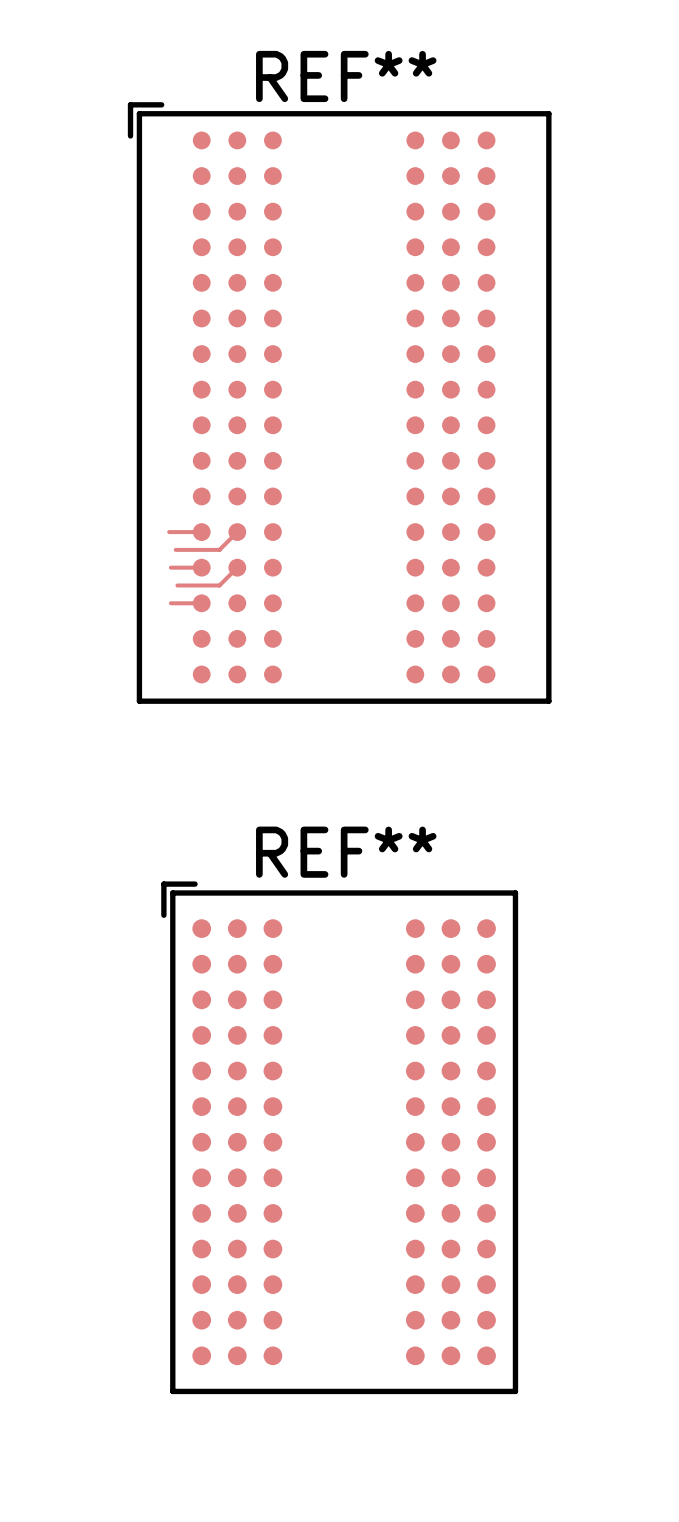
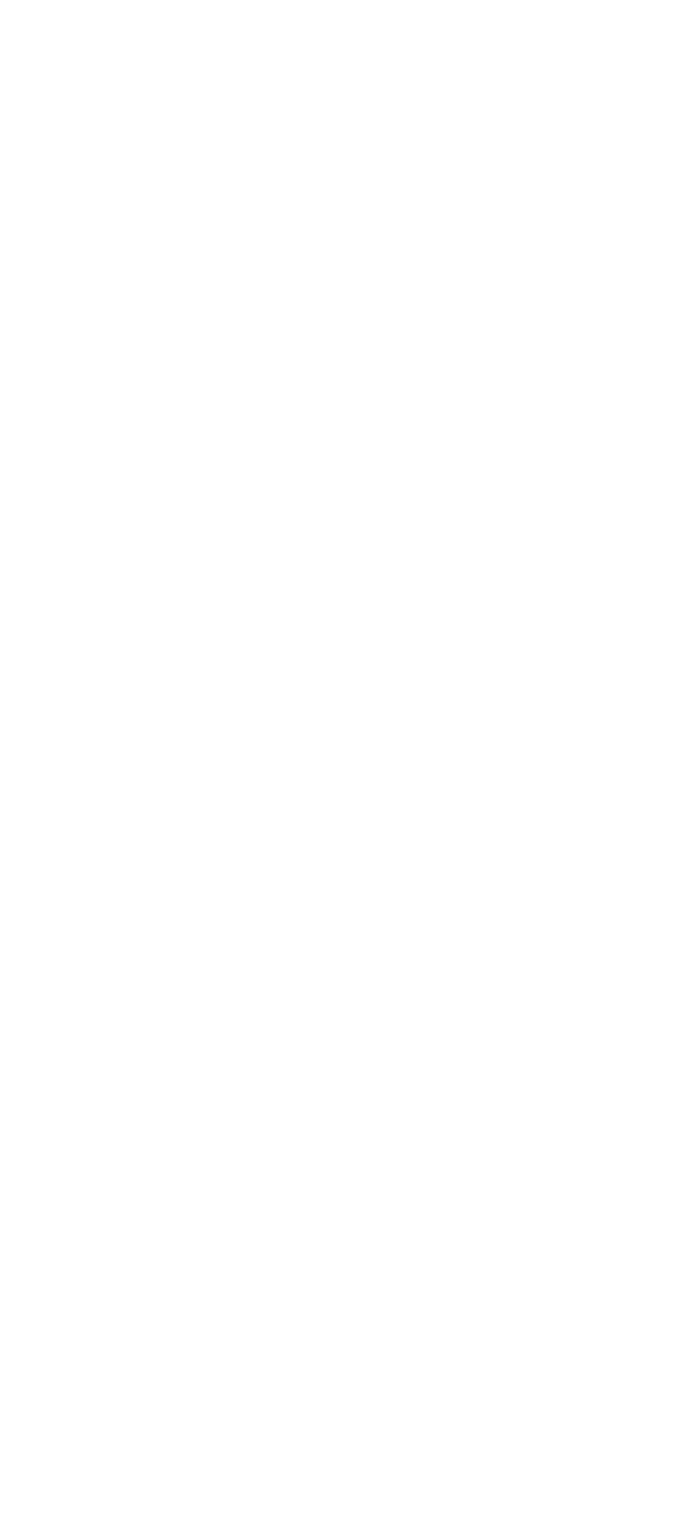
REF**: (339, 403) -> none
top track: (169, 532) (201, 532) -> none
top track: (237, 532) (219, 549) (175, 549) -> none
top track: (170, 567) (201, 567) -> none
top track: (237, 567) (219, 585) (177, 585) -> none
top track: (170, 603) (201, 603) -> none
REF**: (339, 1137) -> none

